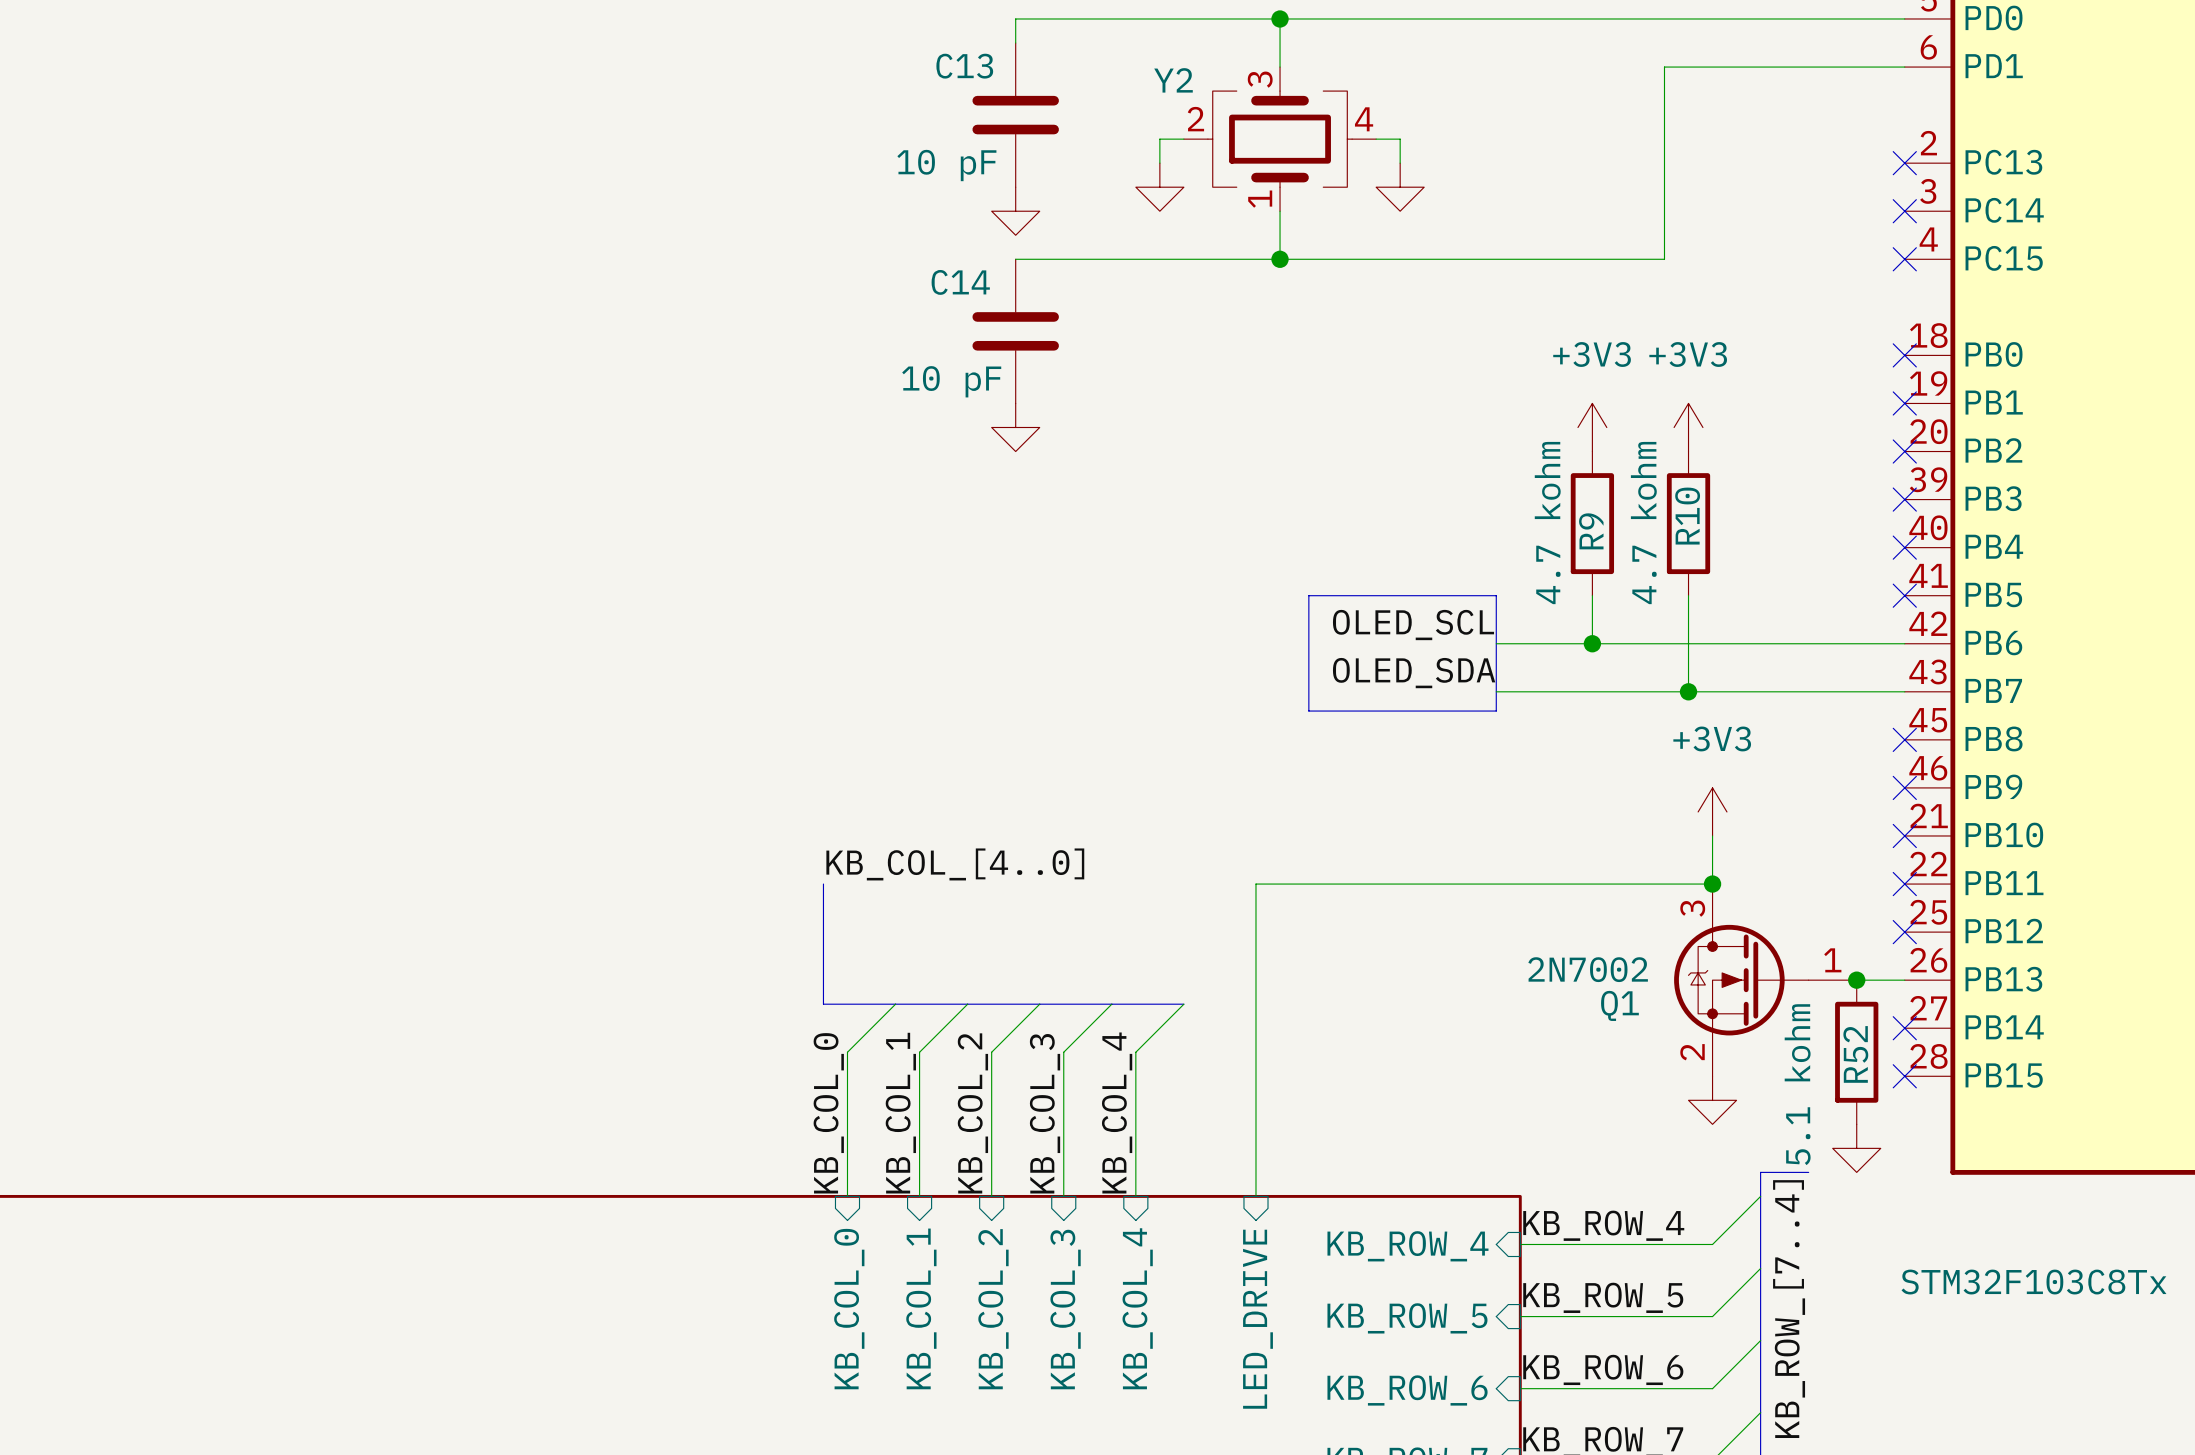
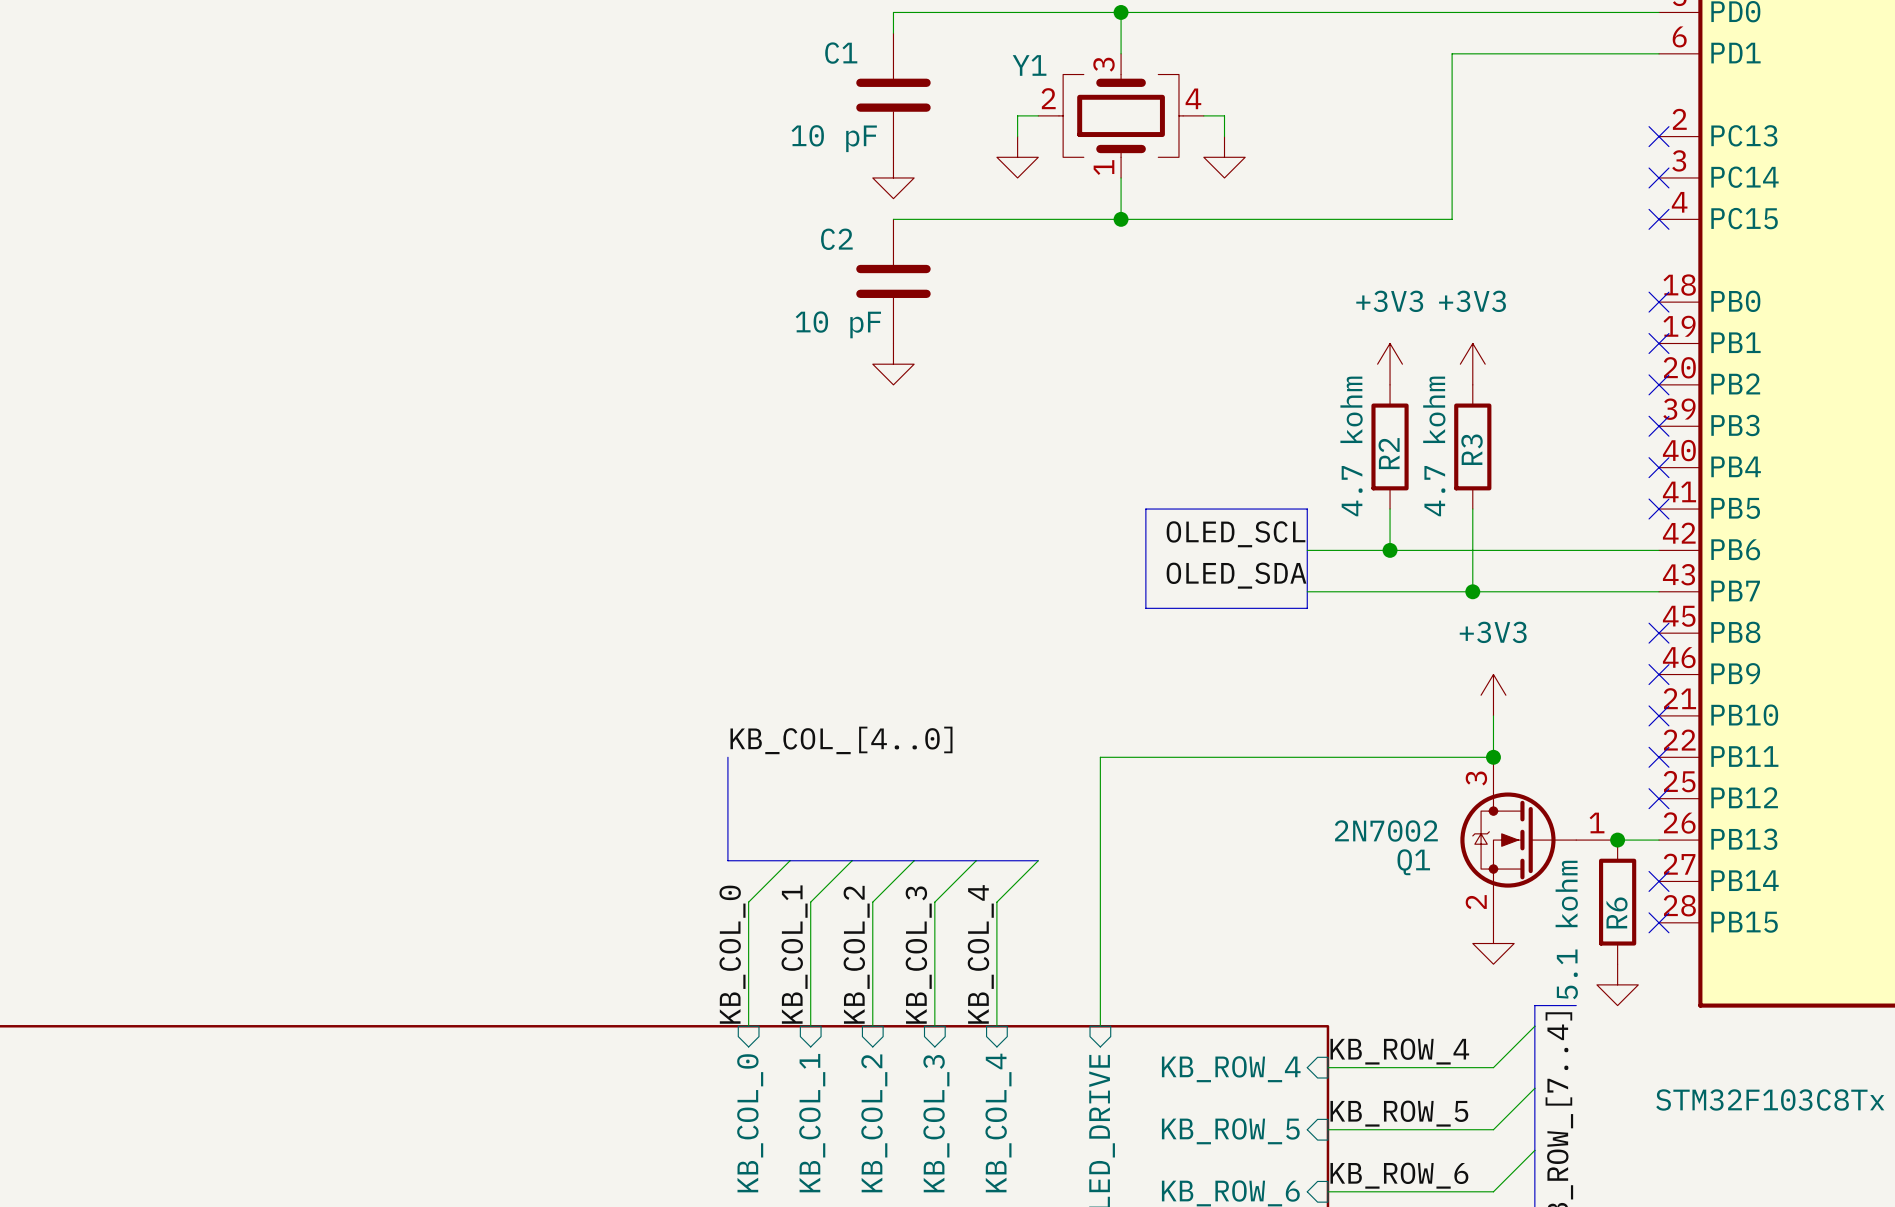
C13 name: C13 (964, 66) -> C1 (841, 53)
Y2 name: Y2 (1173, 80) -> Y1 (1029, 65)
C14 name: C14 (960, 282) -> C2 (836, 239)
R10 name: R10 (1687, 516) -> R3 (1472, 449)
R9 name: R9 (1591, 531) -> R2 (1389, 453)
R52 name: R52 (1855, 1054) -> R6 (1617, 912)

